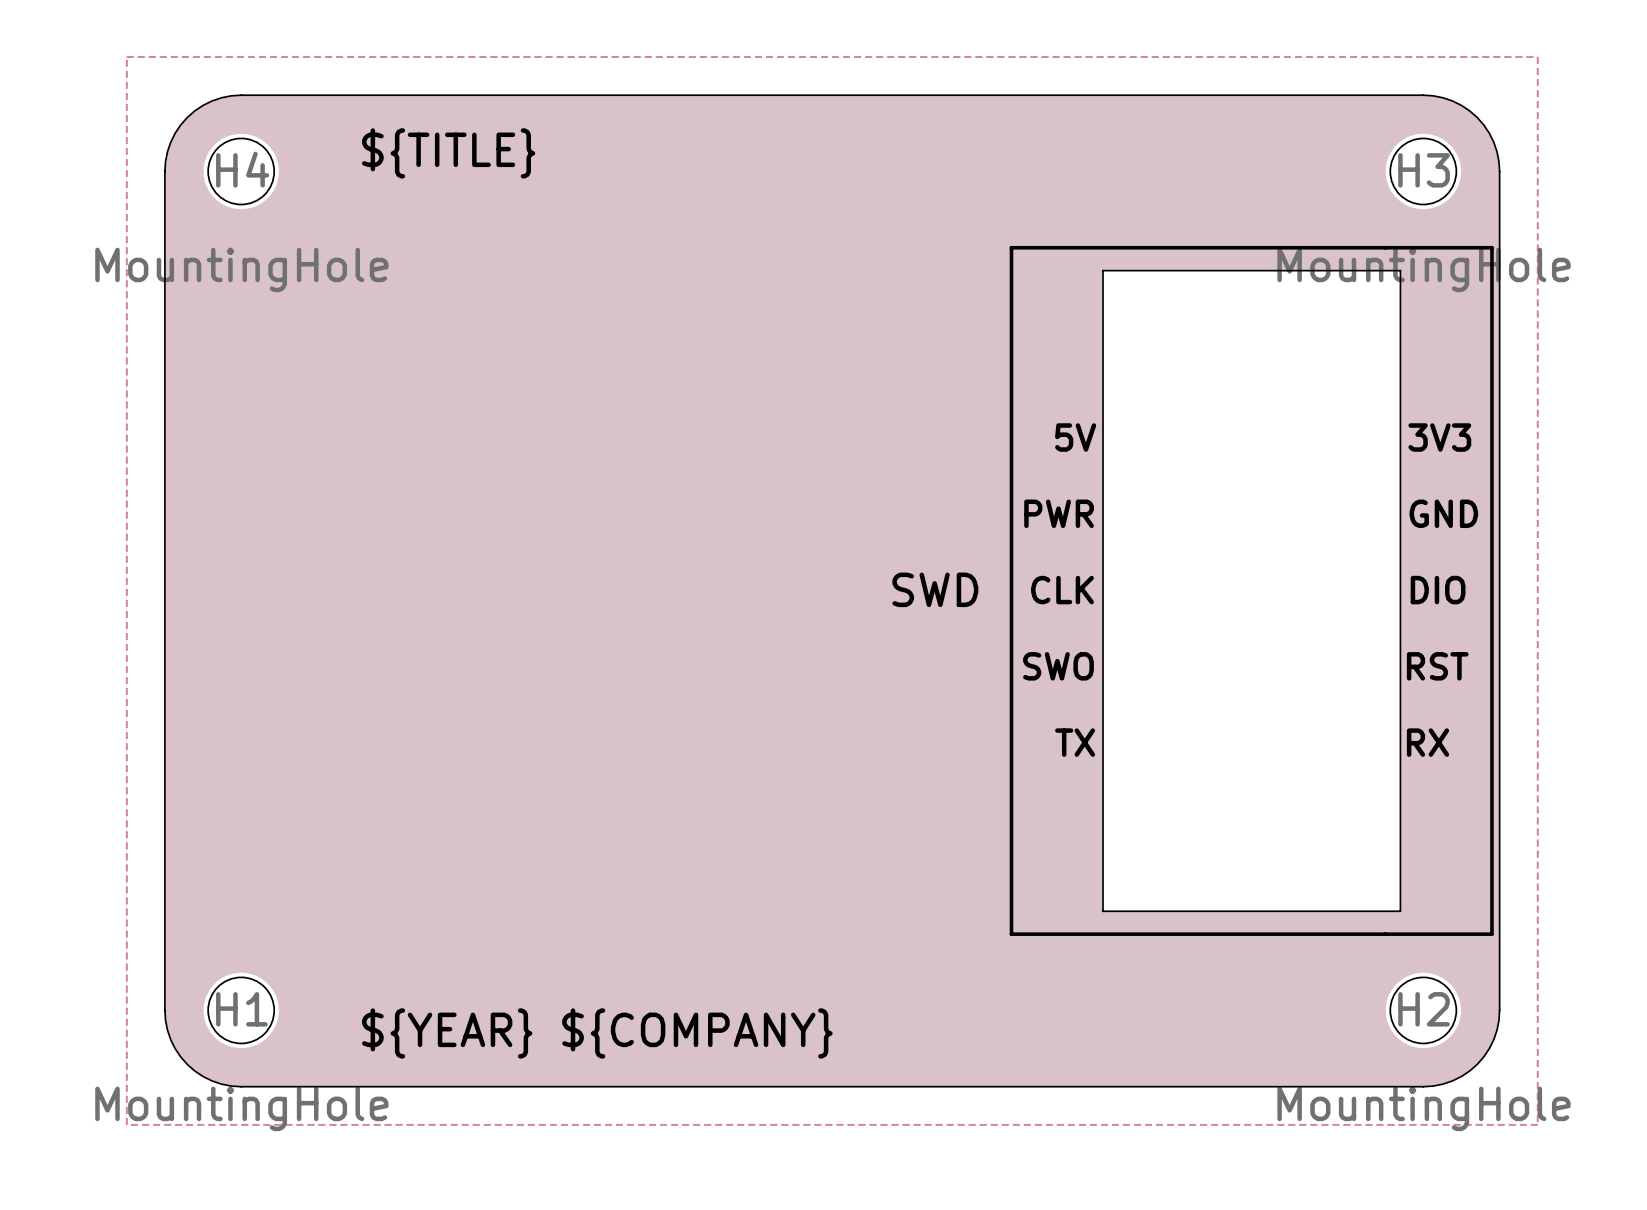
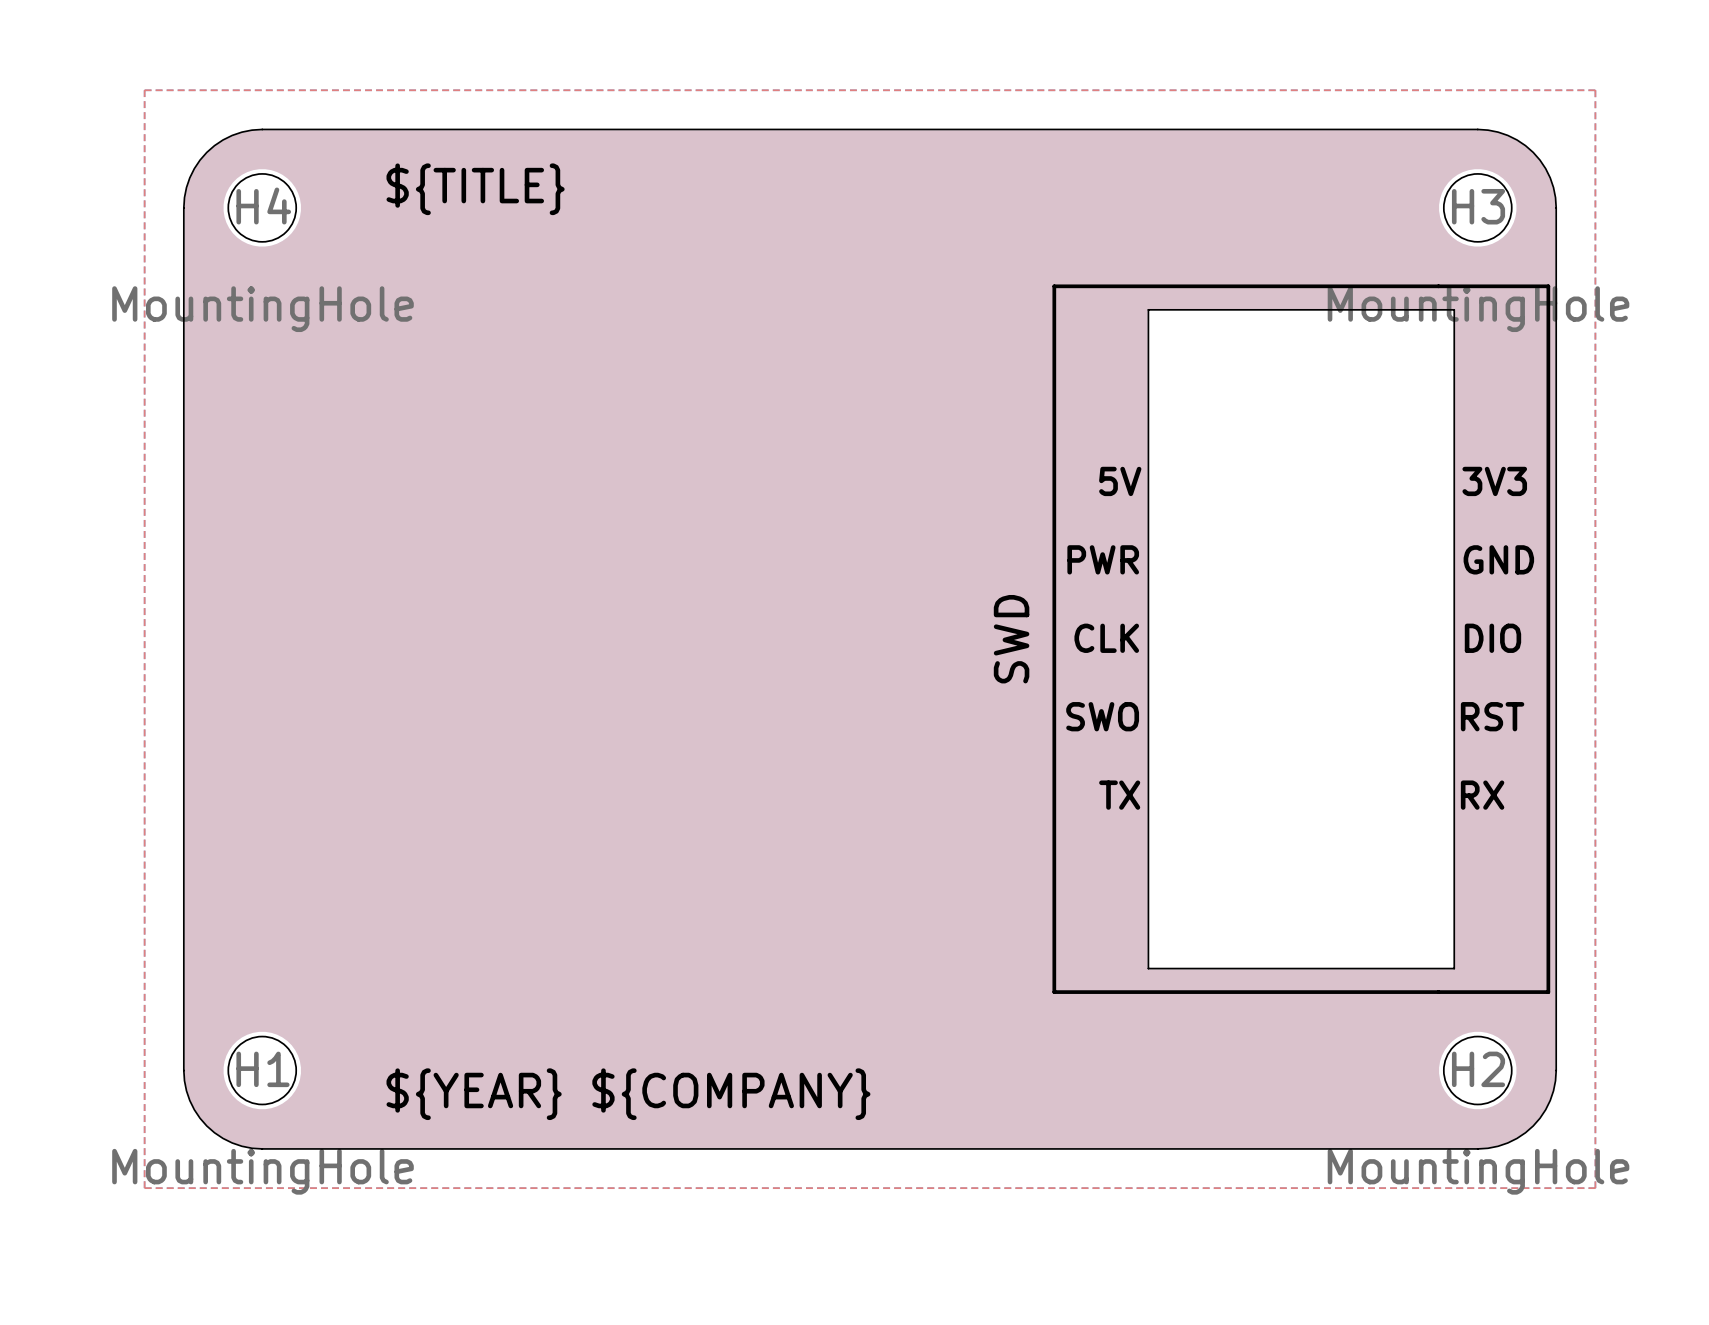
text rotation: 0° (935, 589) -> 90° counterclockwise (1011, 639)

